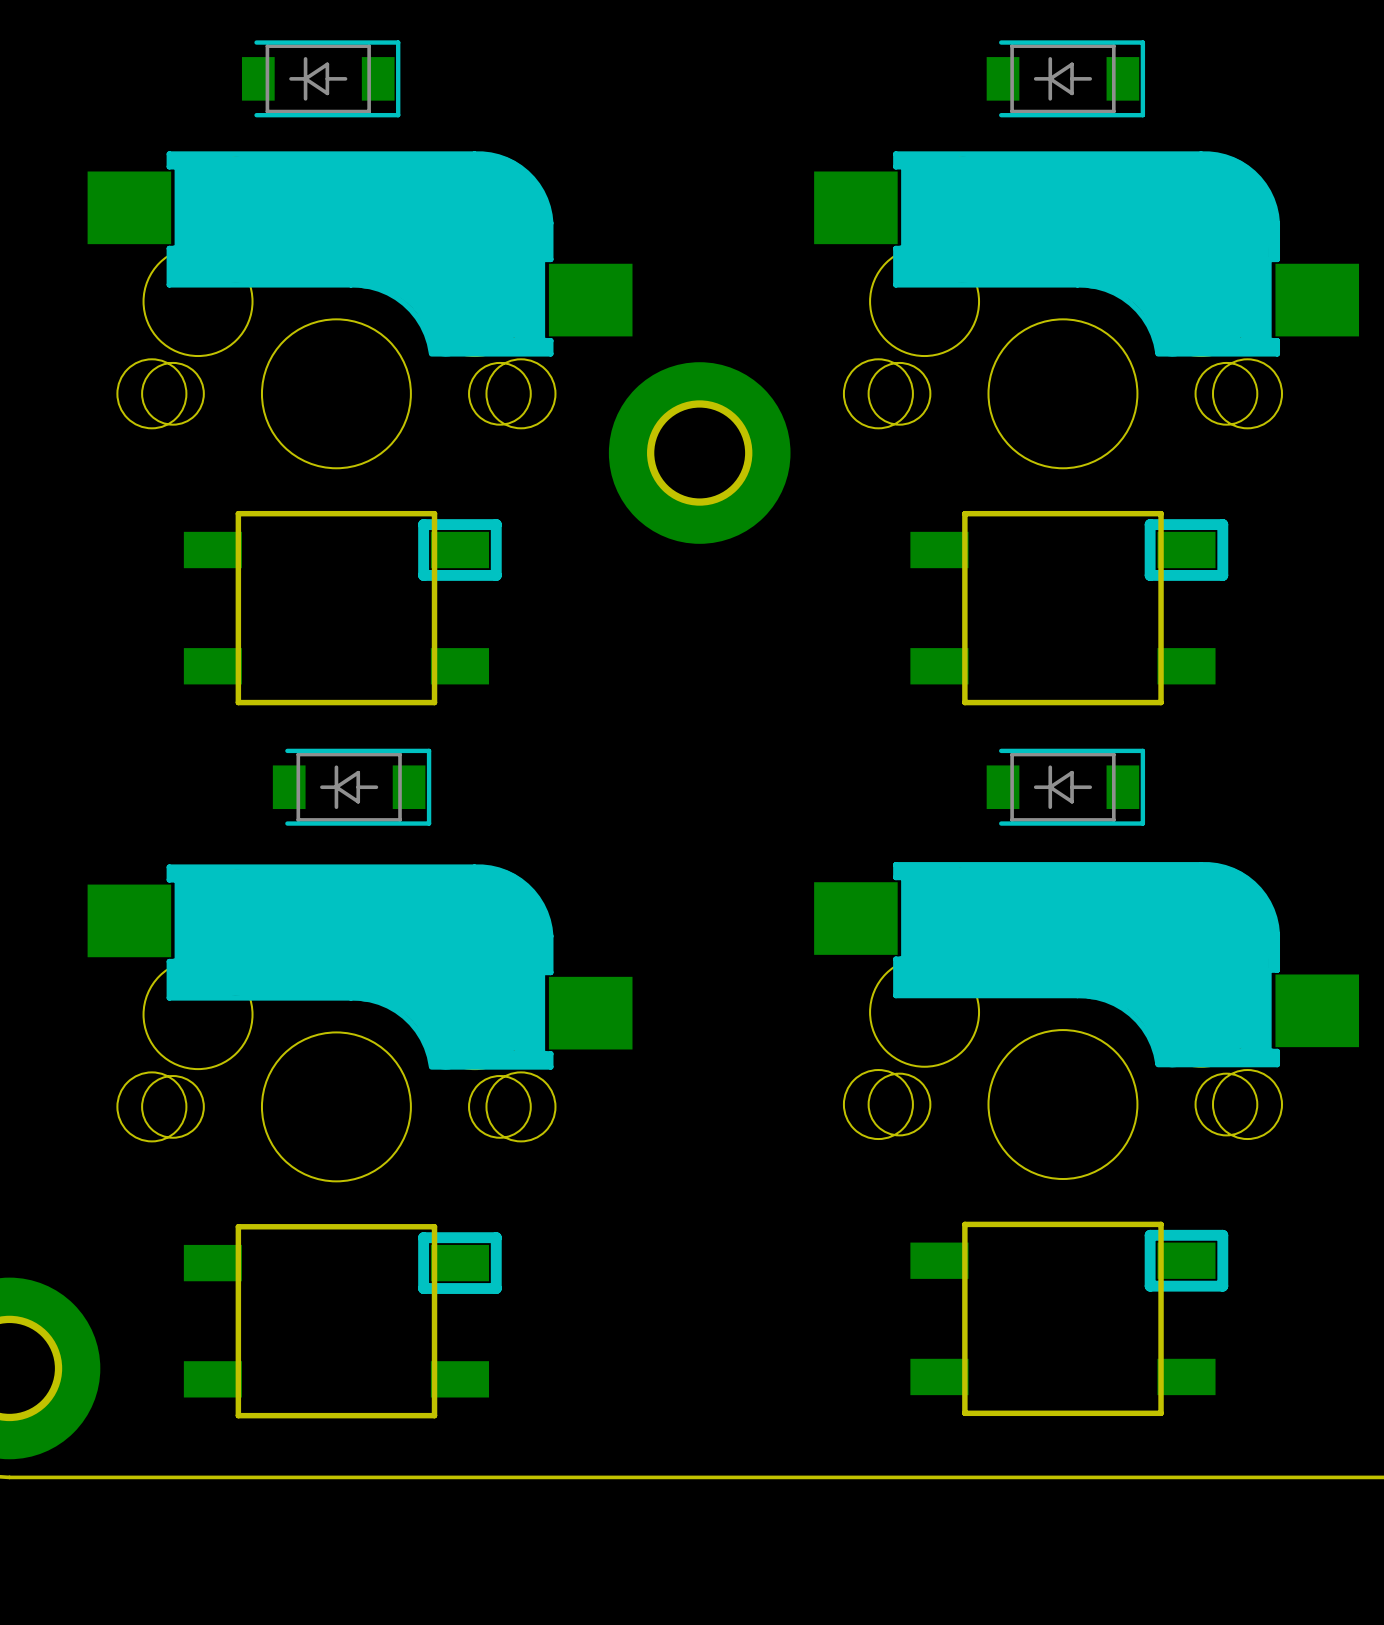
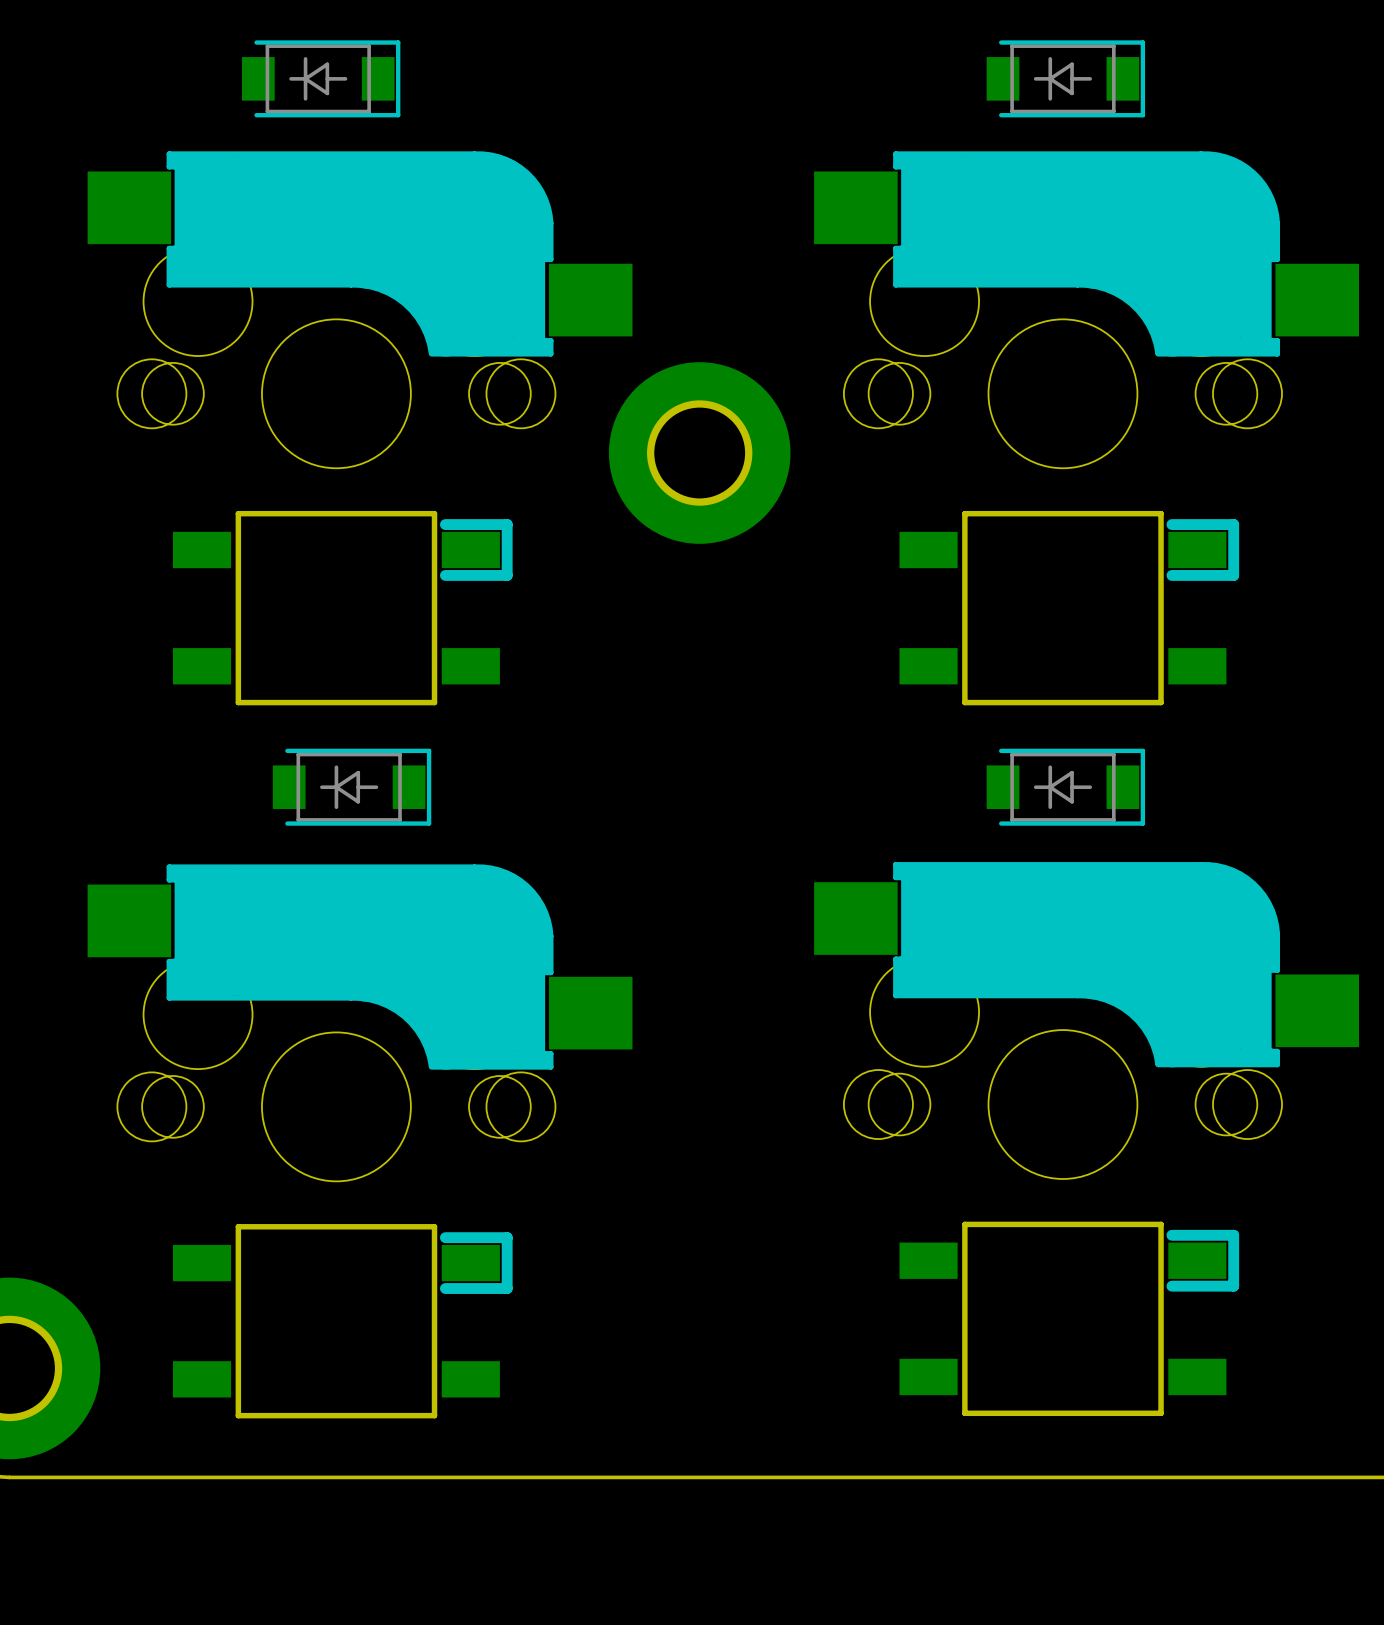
part footprint: [87, 151, 633, 706] -> [87, 151, 633, 706]
part footprint: [814, 151, 1360, 706] -> [814, 151, 1360, 706]
part footprint: [814, 862, 1360, 1417] -> [814, 862, 1360, 1417]
part footprint: [87, 864, 633, 1419] -> [87, 864, 633, 1419]

